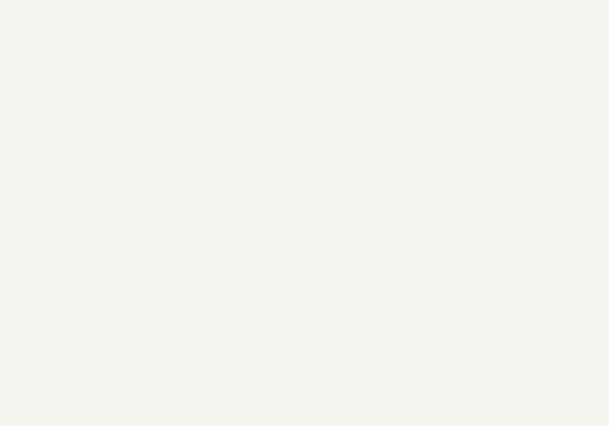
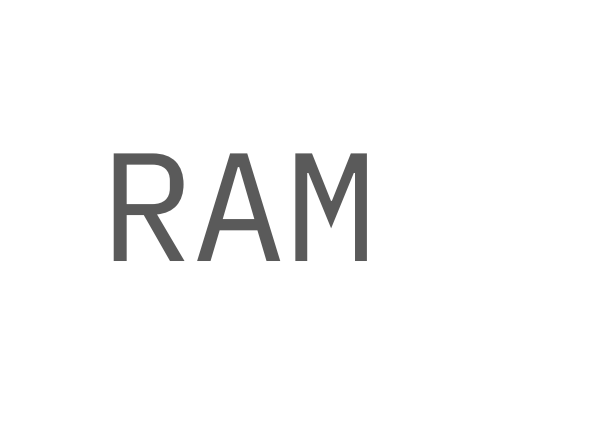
text: none -> RAM (240, 207)

